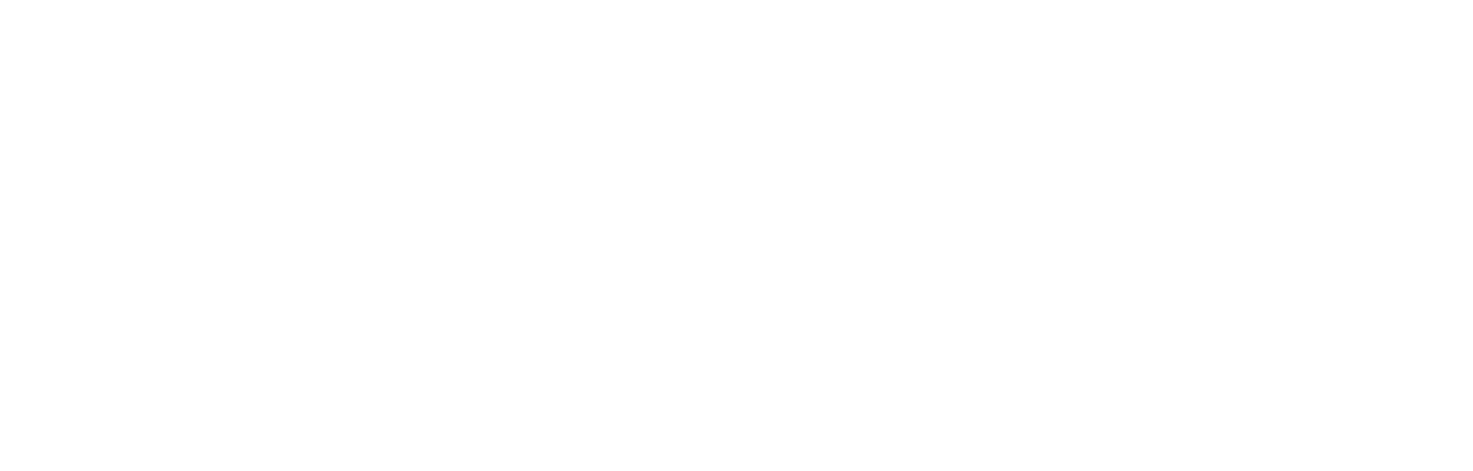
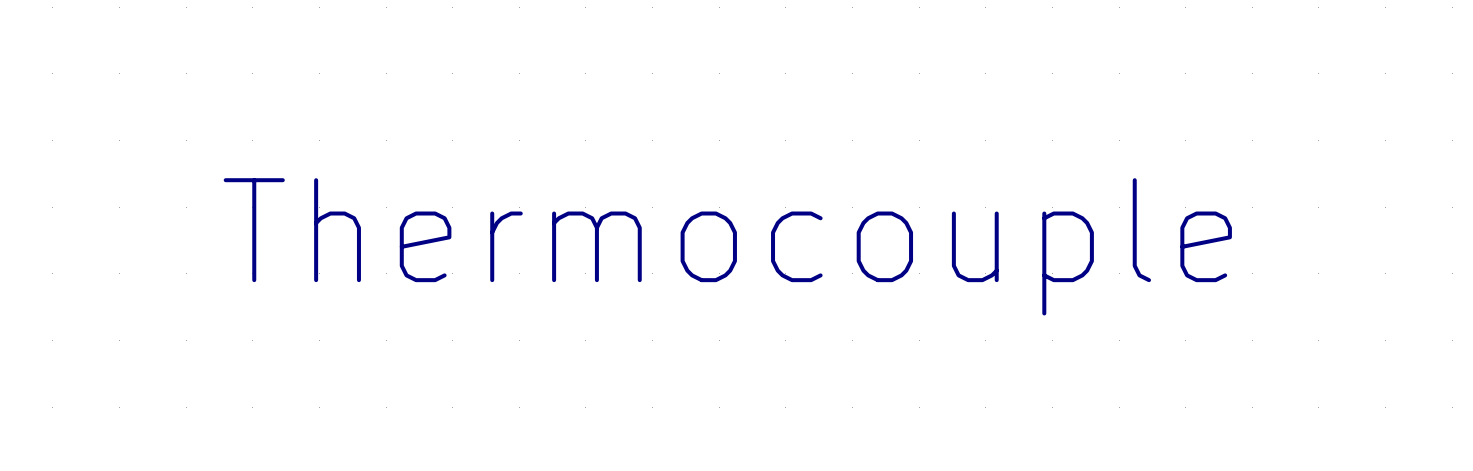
text: none -> Thermocouple (727, 246)

